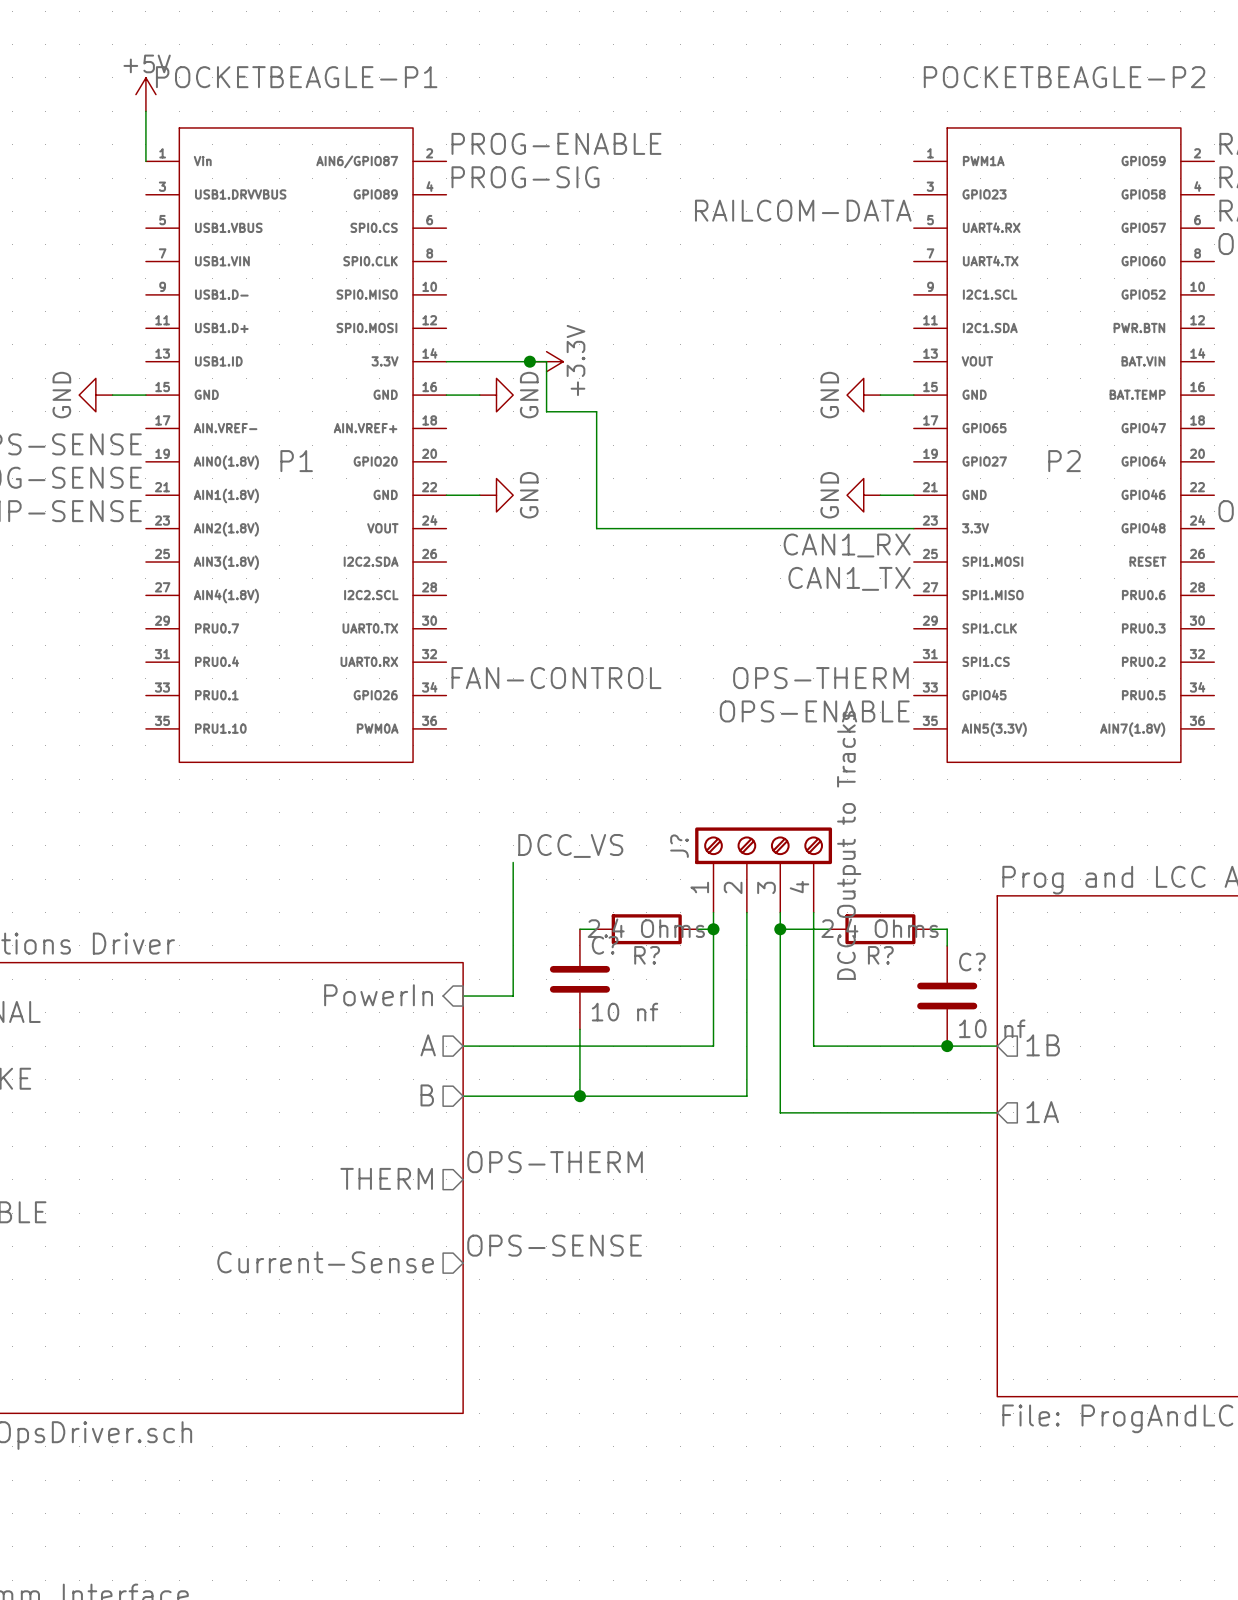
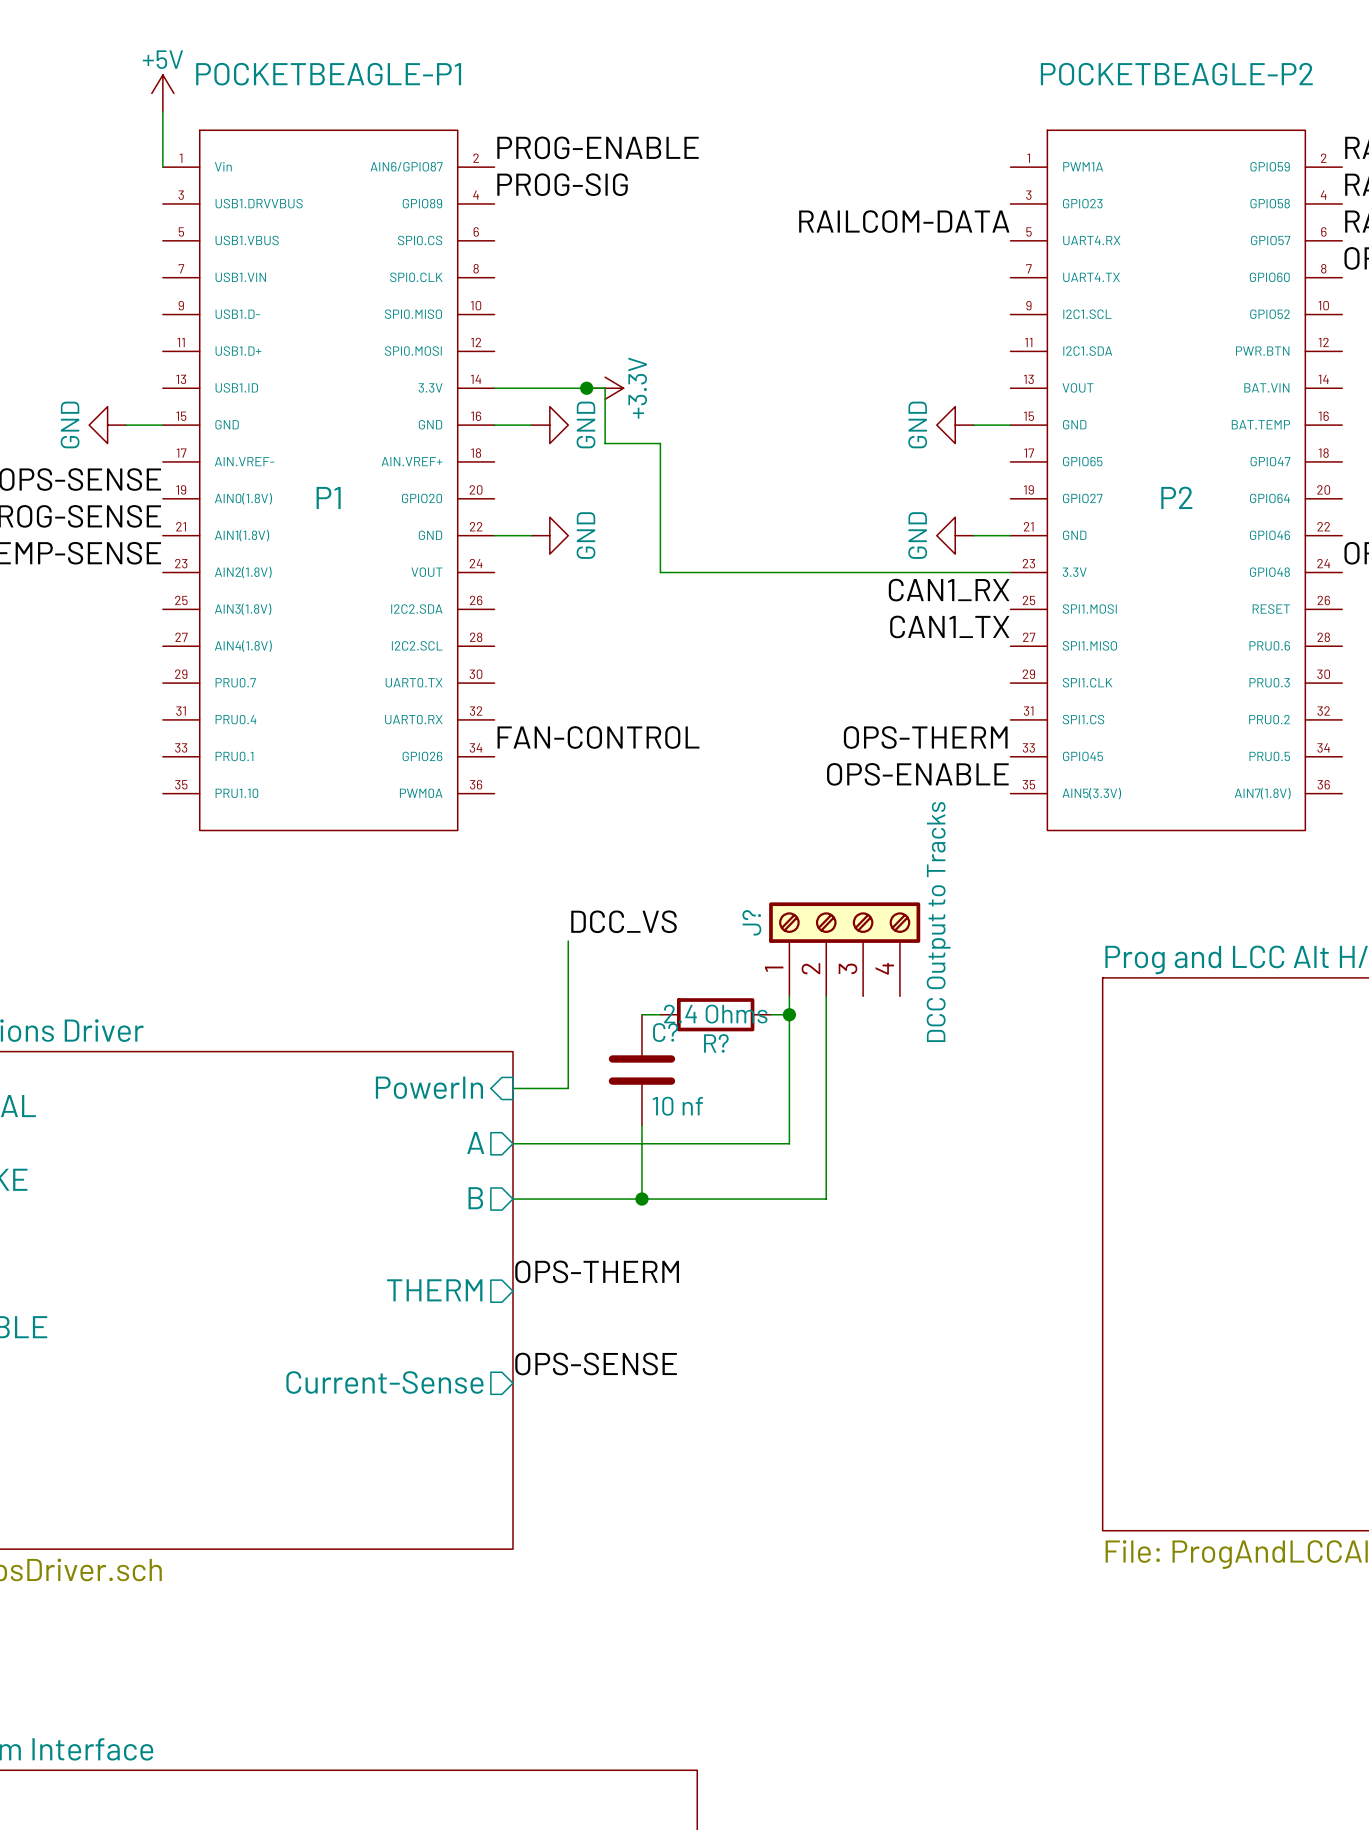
wire: (780, 912) (780, 1112) (997, 1112) -> none
wire: (813, 912) (813, 1046) (997, 1046) -> none
wire: (780, 929) (830, 929) -> none
junction: (780, 929) -> none
R?: 2.4 Ohms (880, 929) -> none
wire: (930, 929) (947, 929) (947, 945) -> none
C?: 10 nf (947, 996) -> none
sheet pin: 1B (1043, 1045) -> none
junction: (947, 1046) -> none
sheet pin: 1A (1042, 1112) -> none

